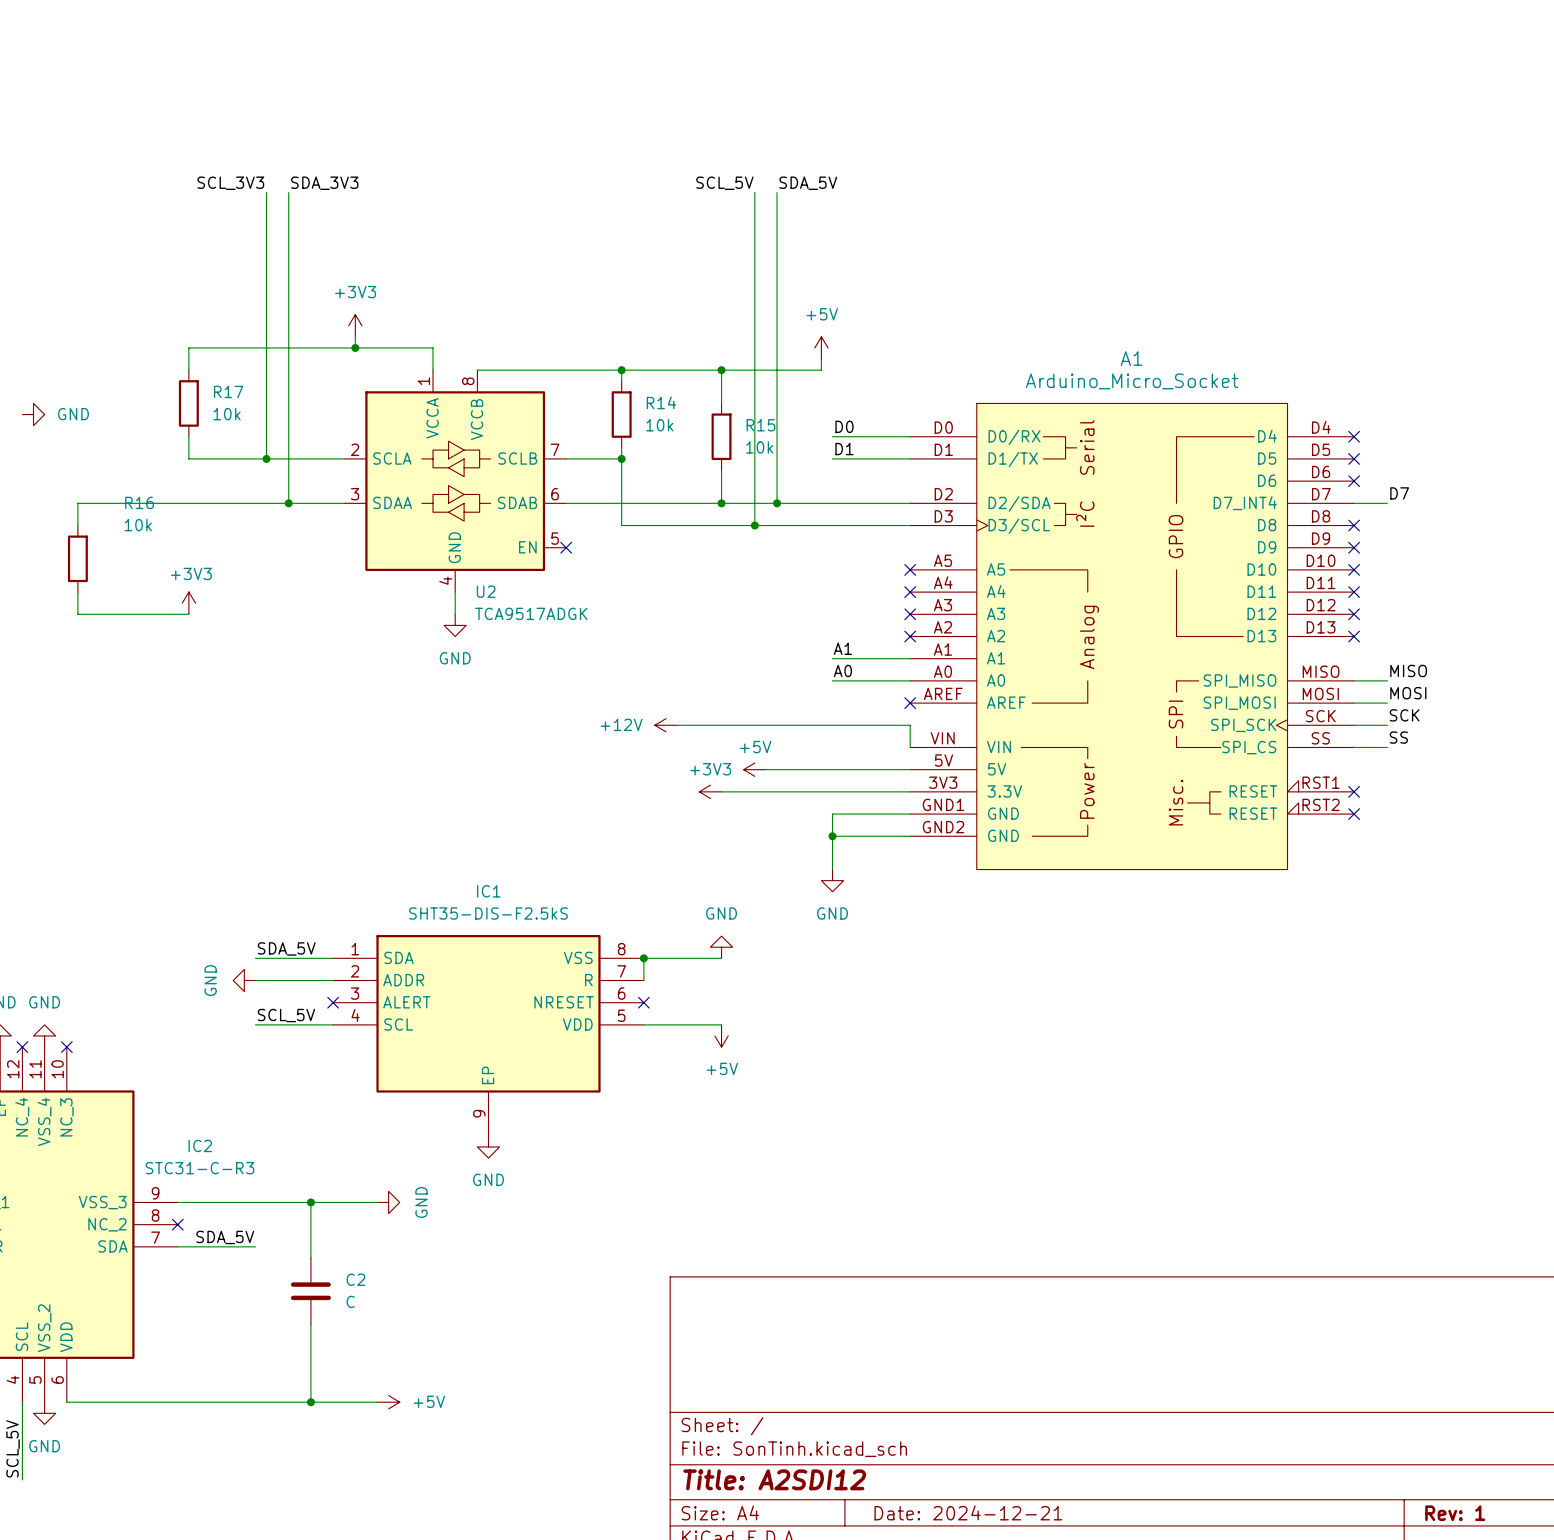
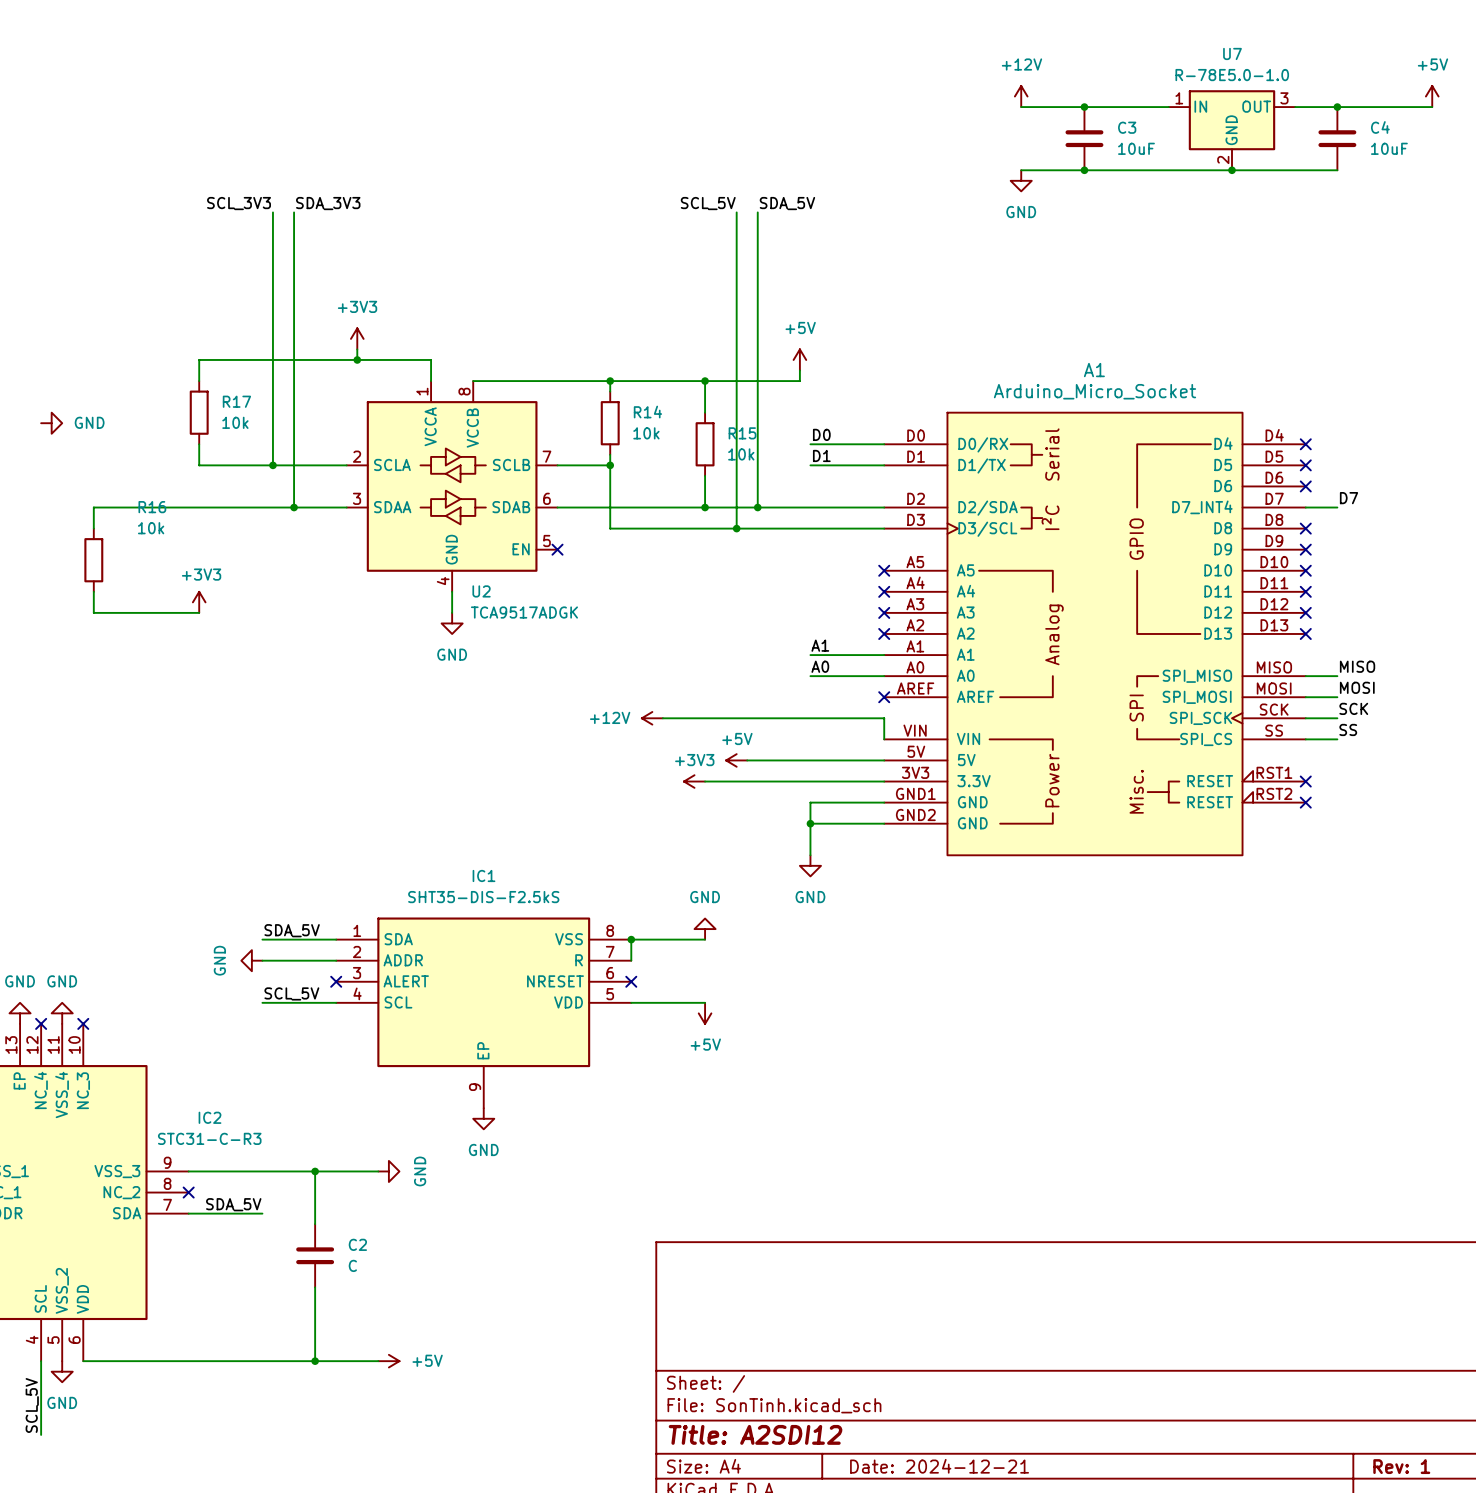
power symbol: none -> +12V (1021, 96)
power symbol: none -> +5V (1432, 96)
wire: none -> (1021, 107) (1168, 107)
junction: none -> (1084, 107)
wire: none -> (1295, 107) (1432, 107)
junction: none -> (1337, 107)
U7: none -> R-78E5.0-1.0 (1232, 130)
C3: none -> 10uF (1084, 138)
C4: none -> 10uF (1337, 138)
wire: none -> (1021, 170) (1337, 170)
junction: none -> (1084, 170)
junction: none -> (1232, 170)
power symbol: none -> GND (1021, 180)

